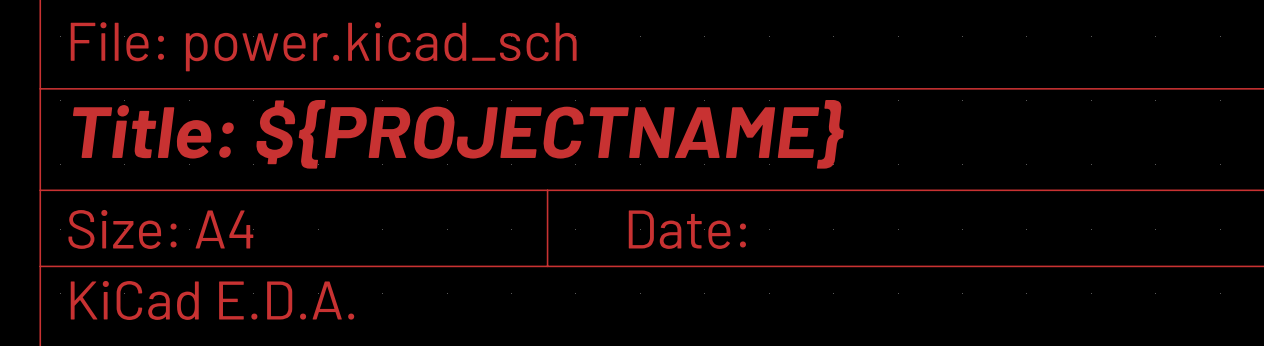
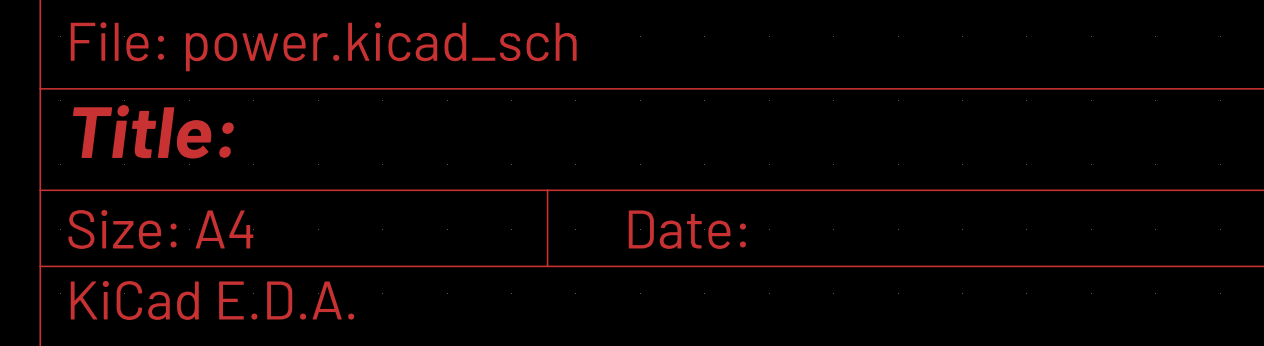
title block: Title: ${PROJECTNAME} (458, 134) -> Title: (153, 131)

